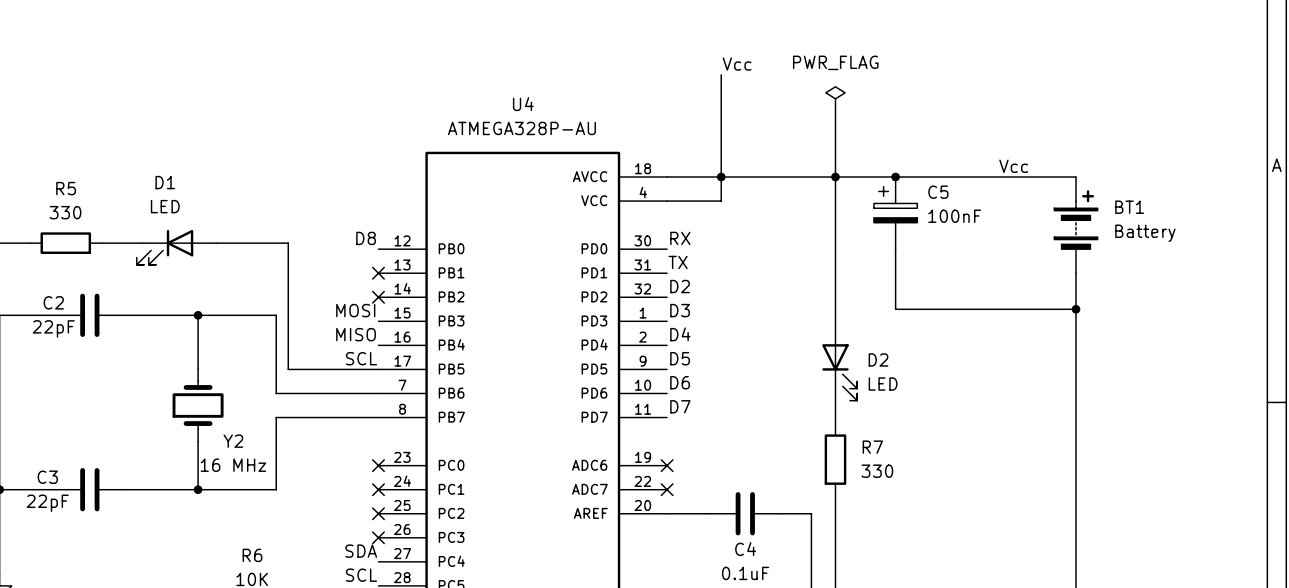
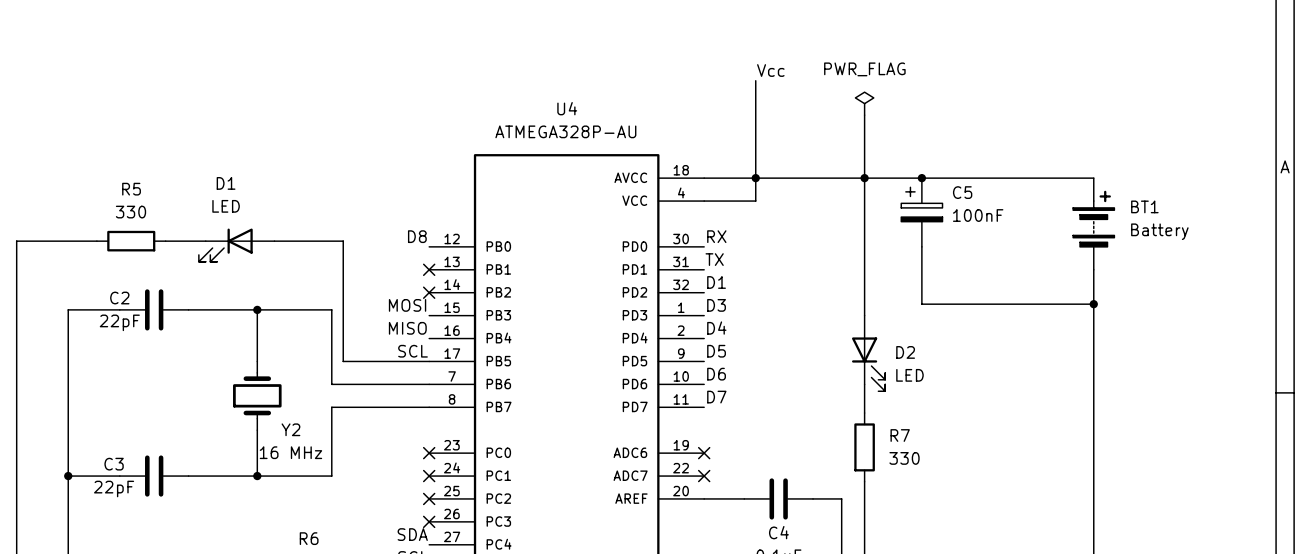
label: Vcc (1013, 166) -> none
label: D2 (680, 286) -> D1 (716, 282)

